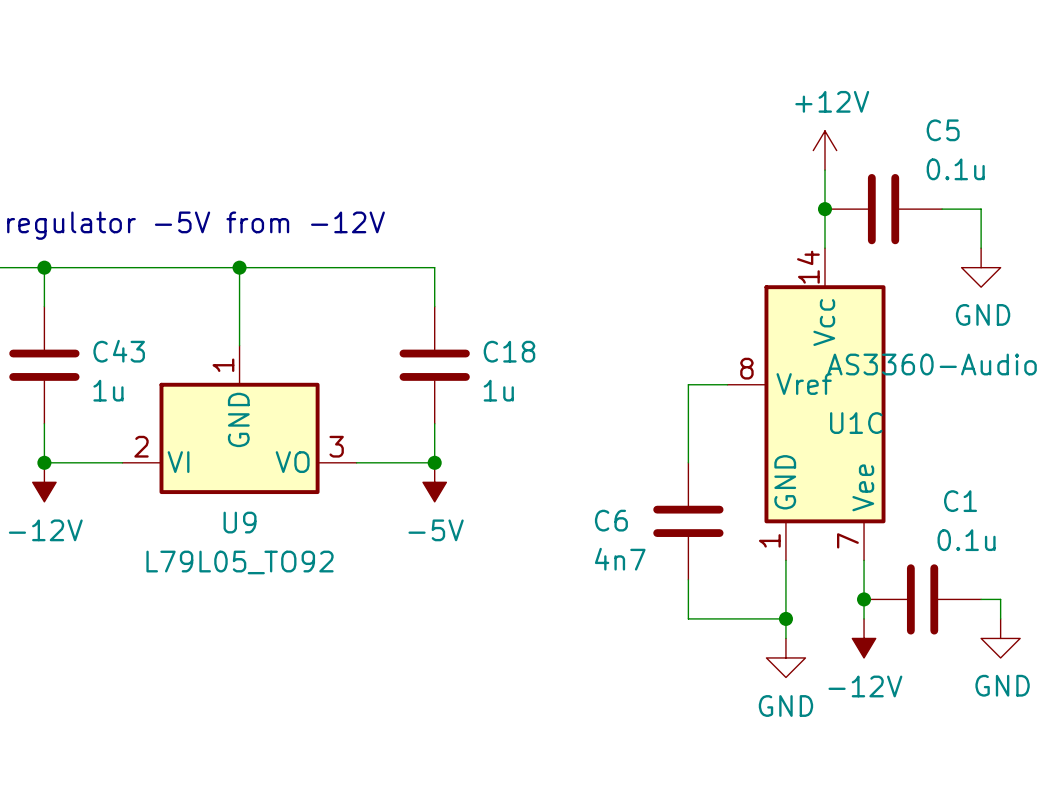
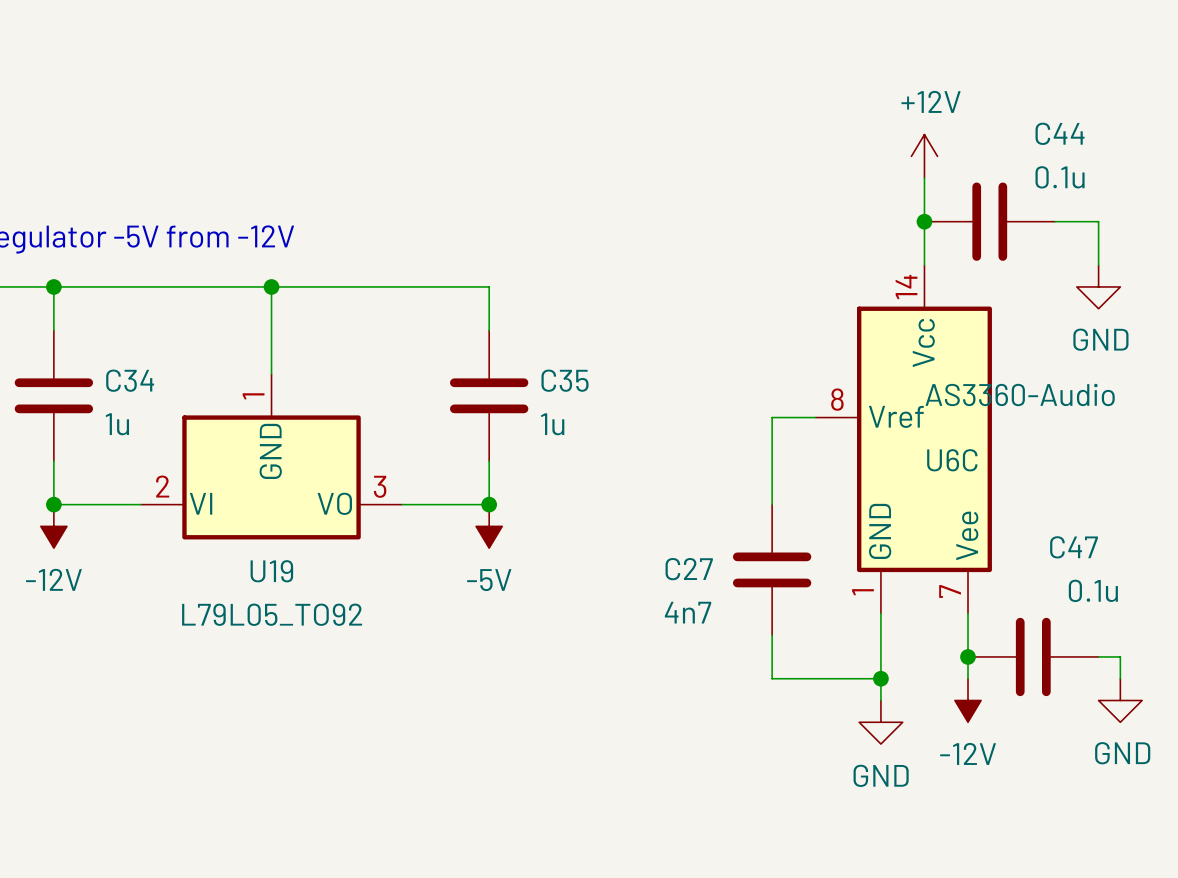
C5 name: C5 (943, 130) -> C44 (1060, 133)
C43 name: C43 (119, 351) -> C34 (130, 380)
C18 name: C18 (509, 351) -> C35 (565, 380)
U1C name: U1C (856, 423) -> U6C (952, 460)
C1 name: C1 (960, 501) -> C47 (1074, 547)
C6 name: C6 (611, 520) -> C27 (689, 569)
U9 name: U9 (240, 522) -> U19 (271, 571)

